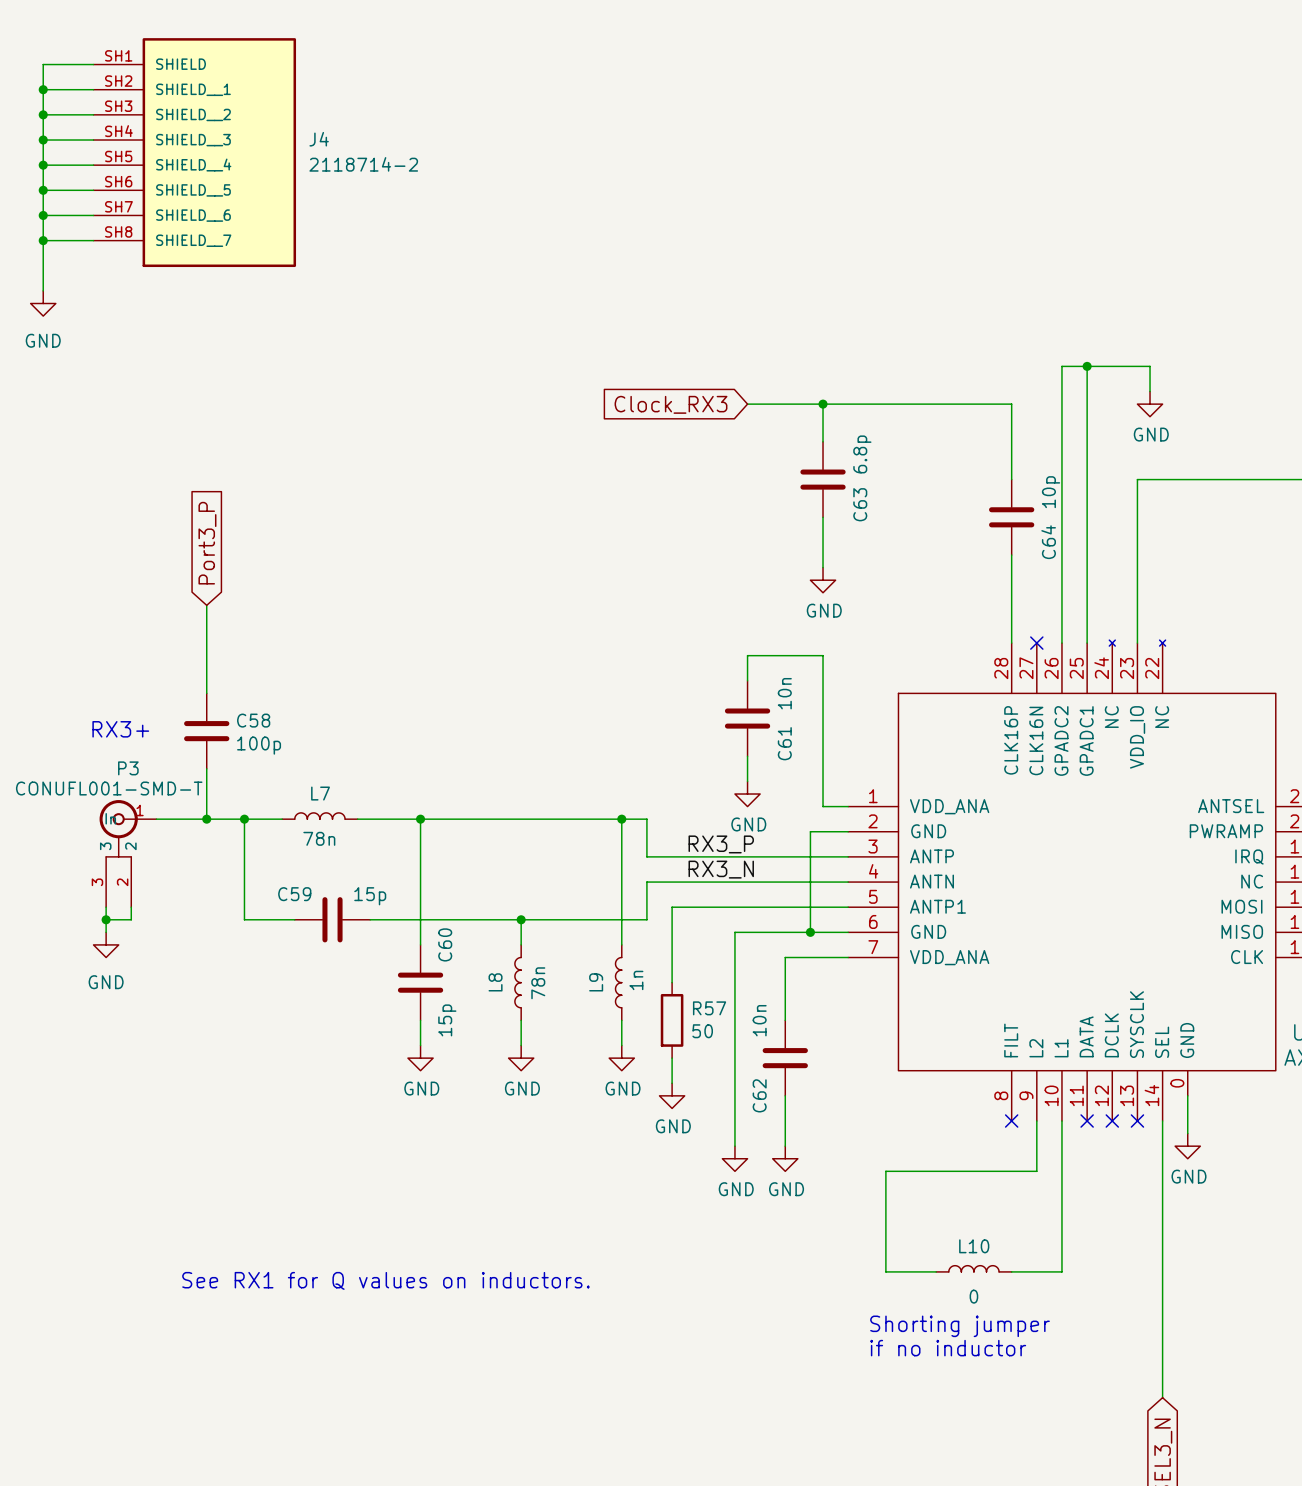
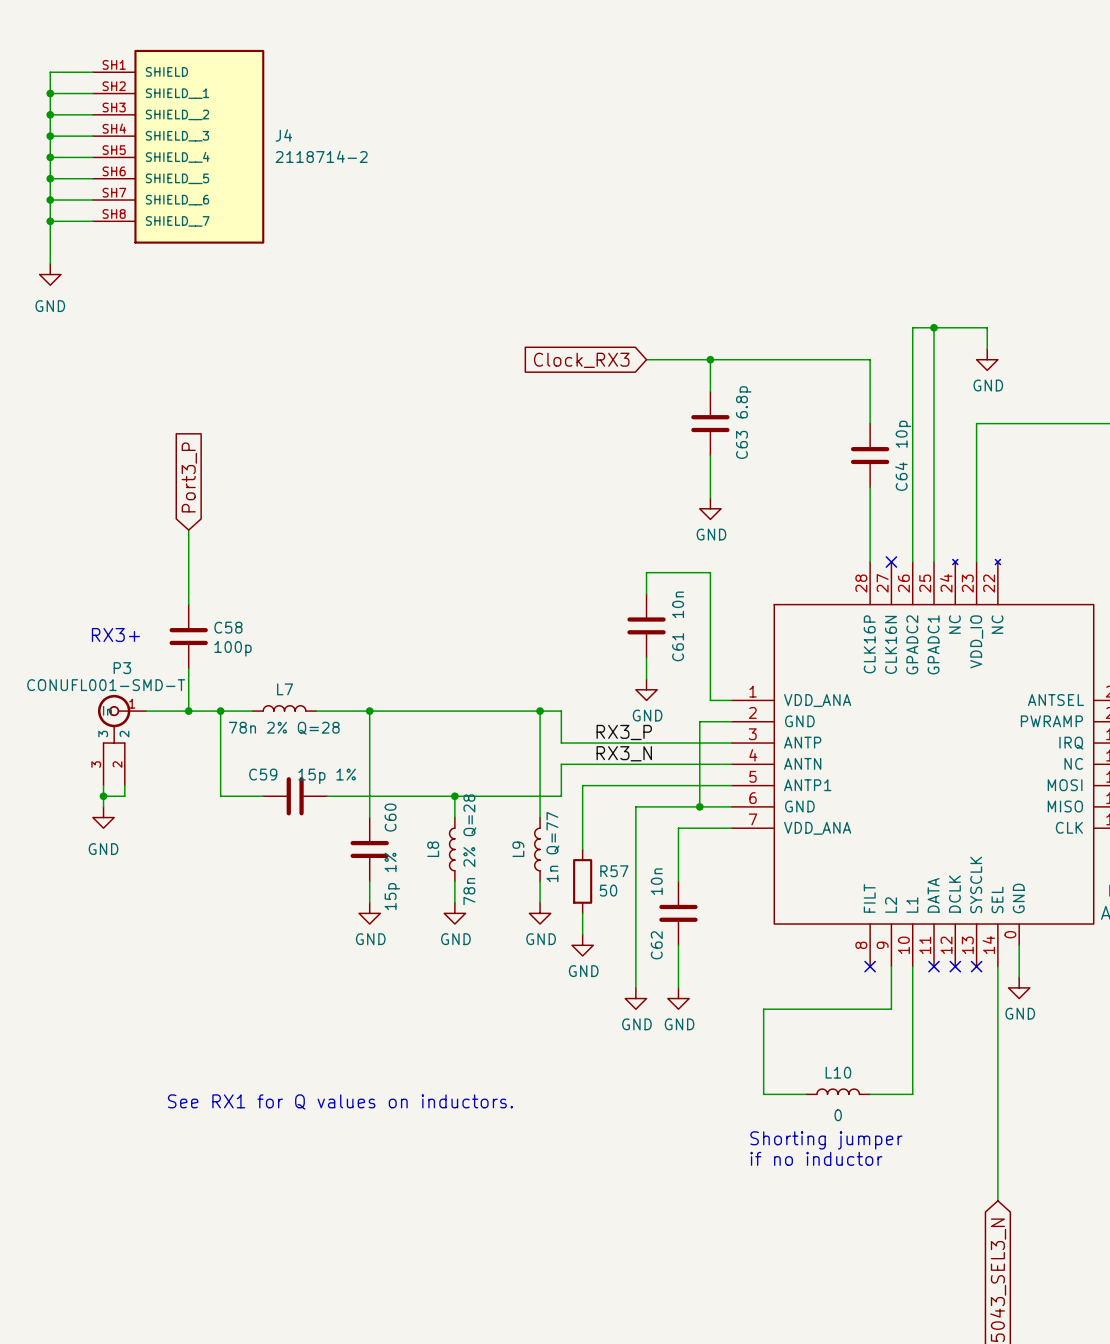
L7 value: 78n (319, 838) -> 78n 2% Q=28 (284, 728)
C59 value: 15p (370, 896) -> 15p 1% (327, 776)
L9 value: 1n (636, 980) -> 1n Q=77 (552, 847)
L8 value: 78n (538, 983) -> 78n 2% Q=28 (469, 849)
C60 value: 15p (447, 1020) -> 15p 1% (392, 881)

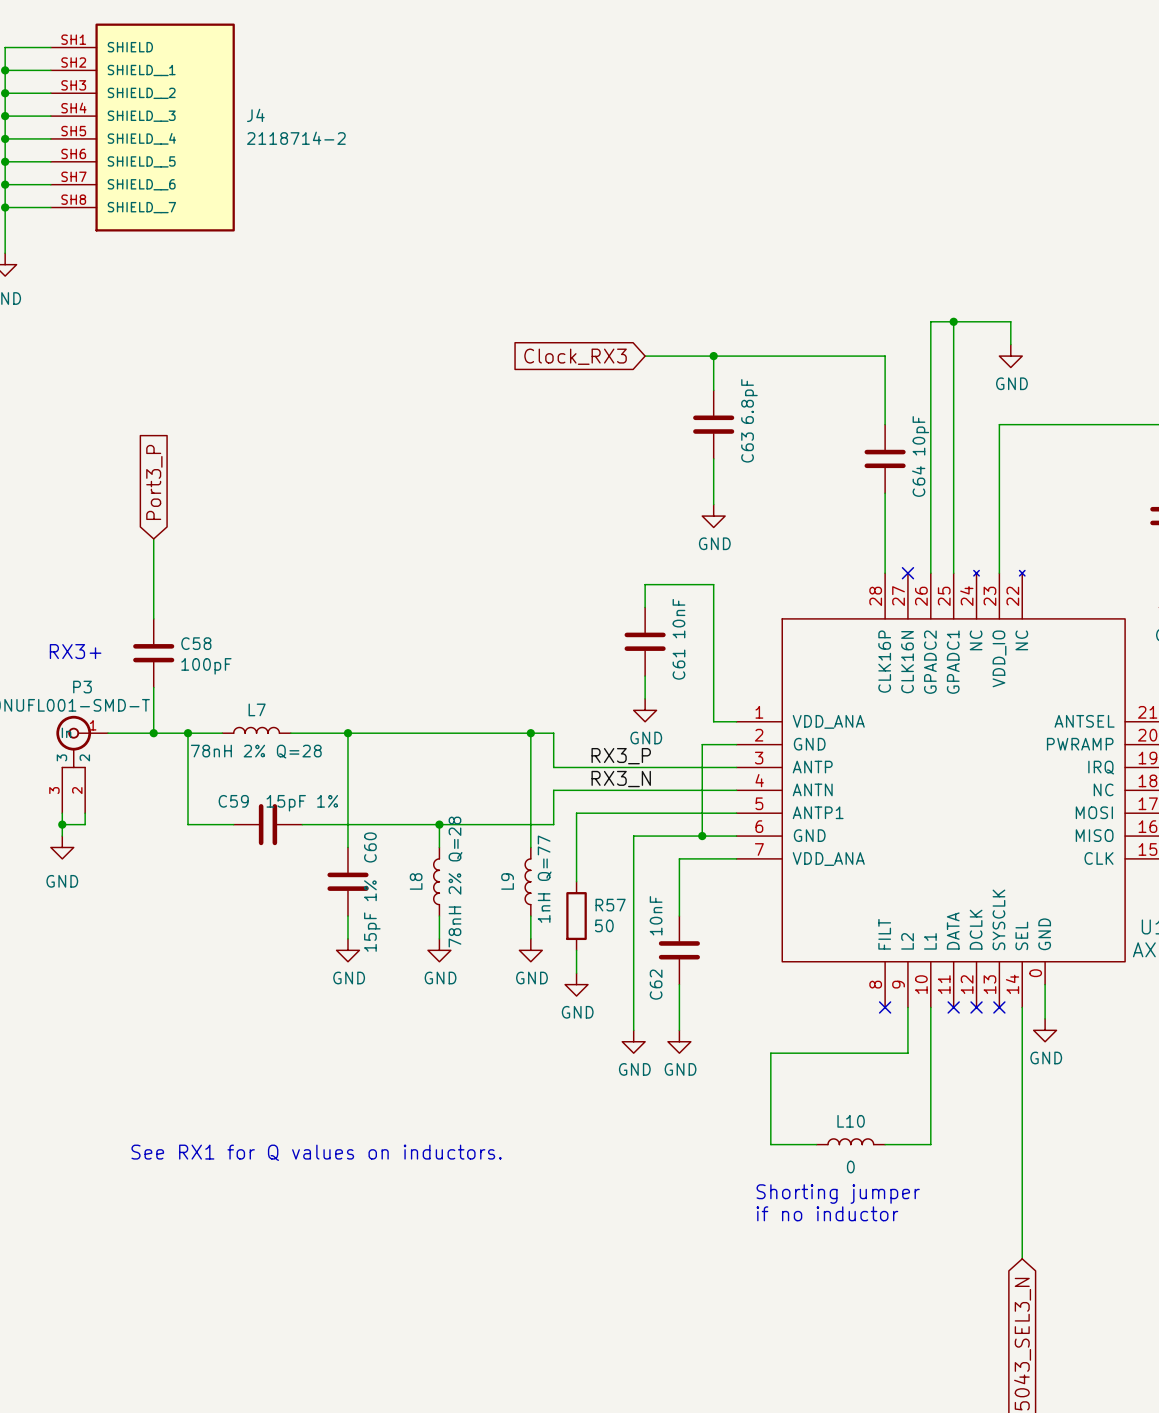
C63 value: 6.8p (743, 402) -> 6.8pF (749, 401)
C64 value: 10p (903, 434) -> 10pF (920, 435)
C61 value: 10n (678, 604) -> 10nF (678, 618)
C58 value: 100p (232, 648) -> 100pF (206, 666)
L7 value: 78n 2% Q=28 (284, 728) -> 78nH 2% Q=28 (256, 751)
C59 value: 15p 1% (327, 776) -> 15pF 1% (302, 803)
L9 value: 1n Q=77 (552, 847) -> 1nH Q=77 (544, 879)
L8 value: 78n 2% Q=28 (469, 849) -> 78nH 2% Q=28 (455, 882)
C60 value: 15p 1% (392, 881) -> 15pF 1% (372, 916)
C62 value: 10n (656, 881) -> 10nF (656, 915)

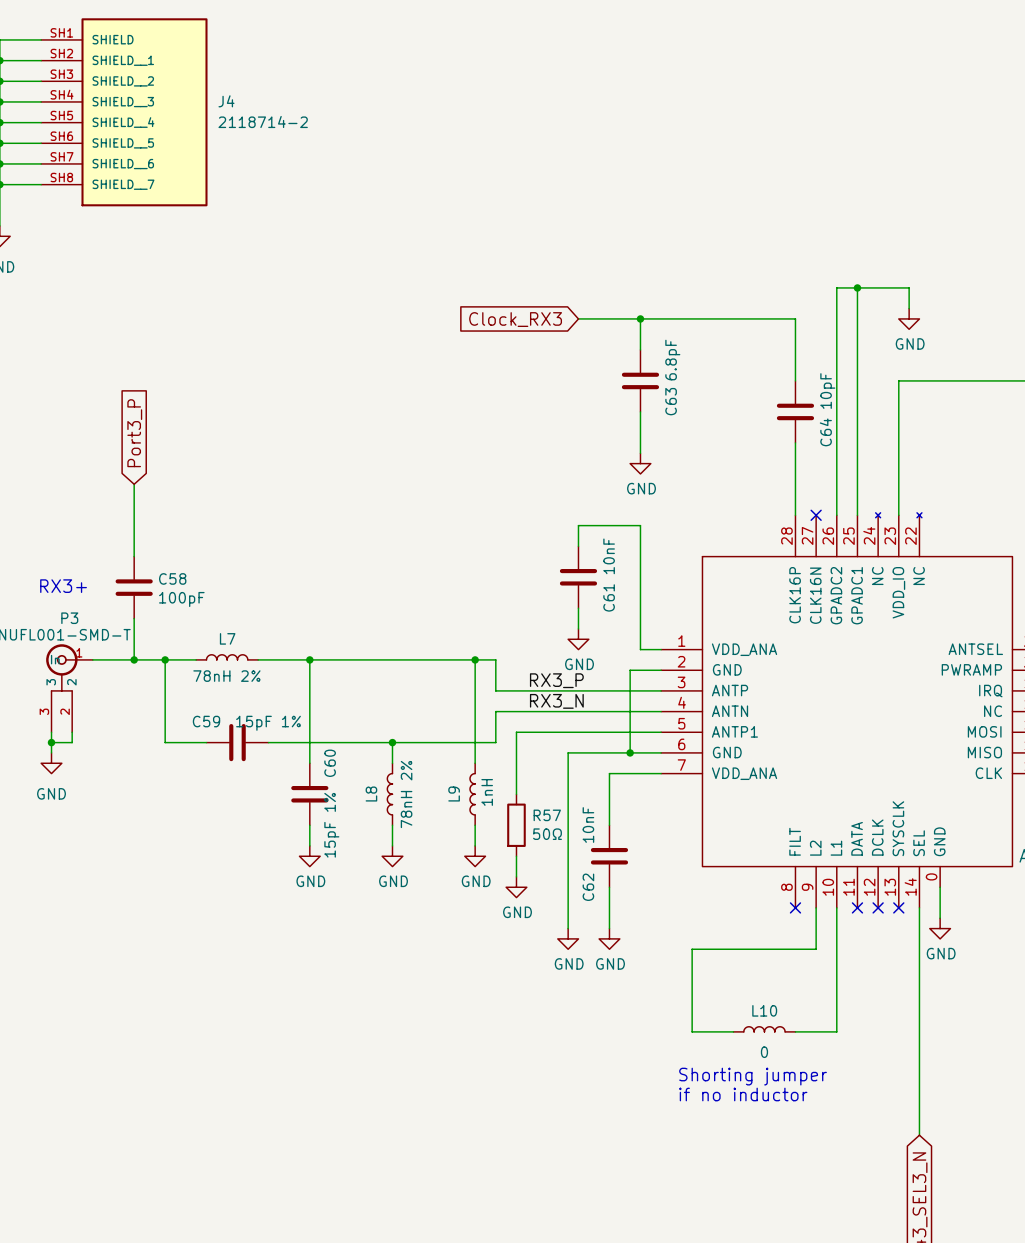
L7 value: 78nH 2% Q=28 (256, 751) -> 78nH 2% (226, 676)
L9 value: 1nH Q=77 (544, 879) -> 1nH (487, 792)
L8 value: 78nH 2% Q=28 (455, 882) -> 78nH 2% (406, 794)
R57 value: 50 (604, 925) -> 50Ω (547, 834)
text: See RX1 for Q values on inductors. (316, 1152) -> none

